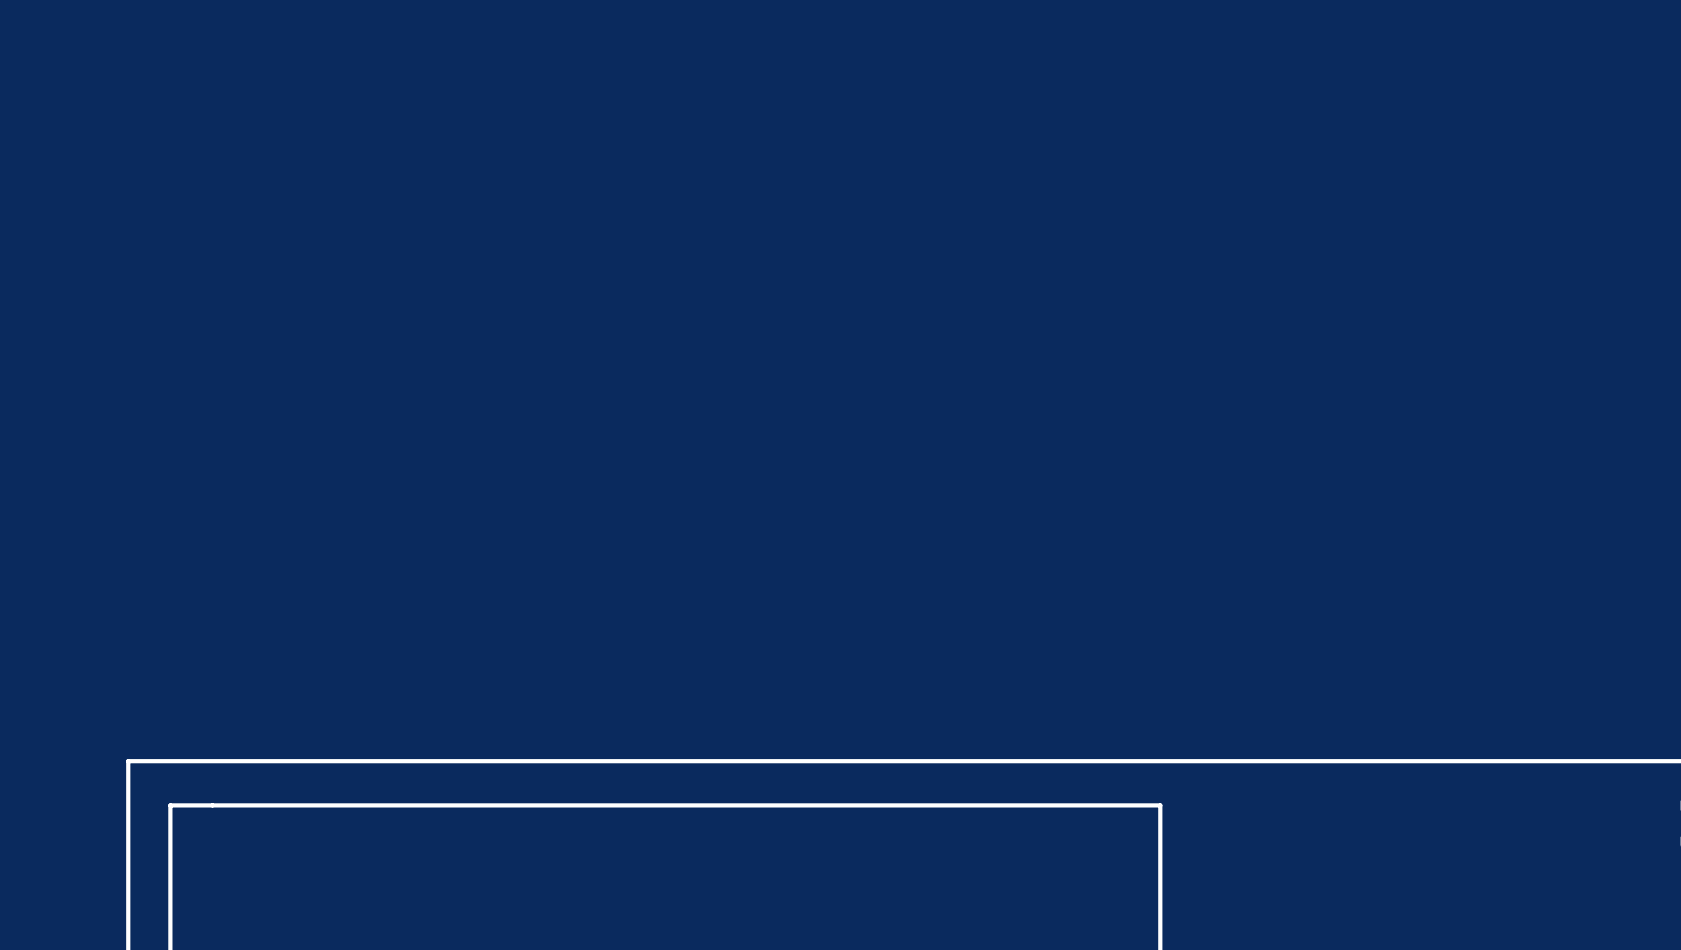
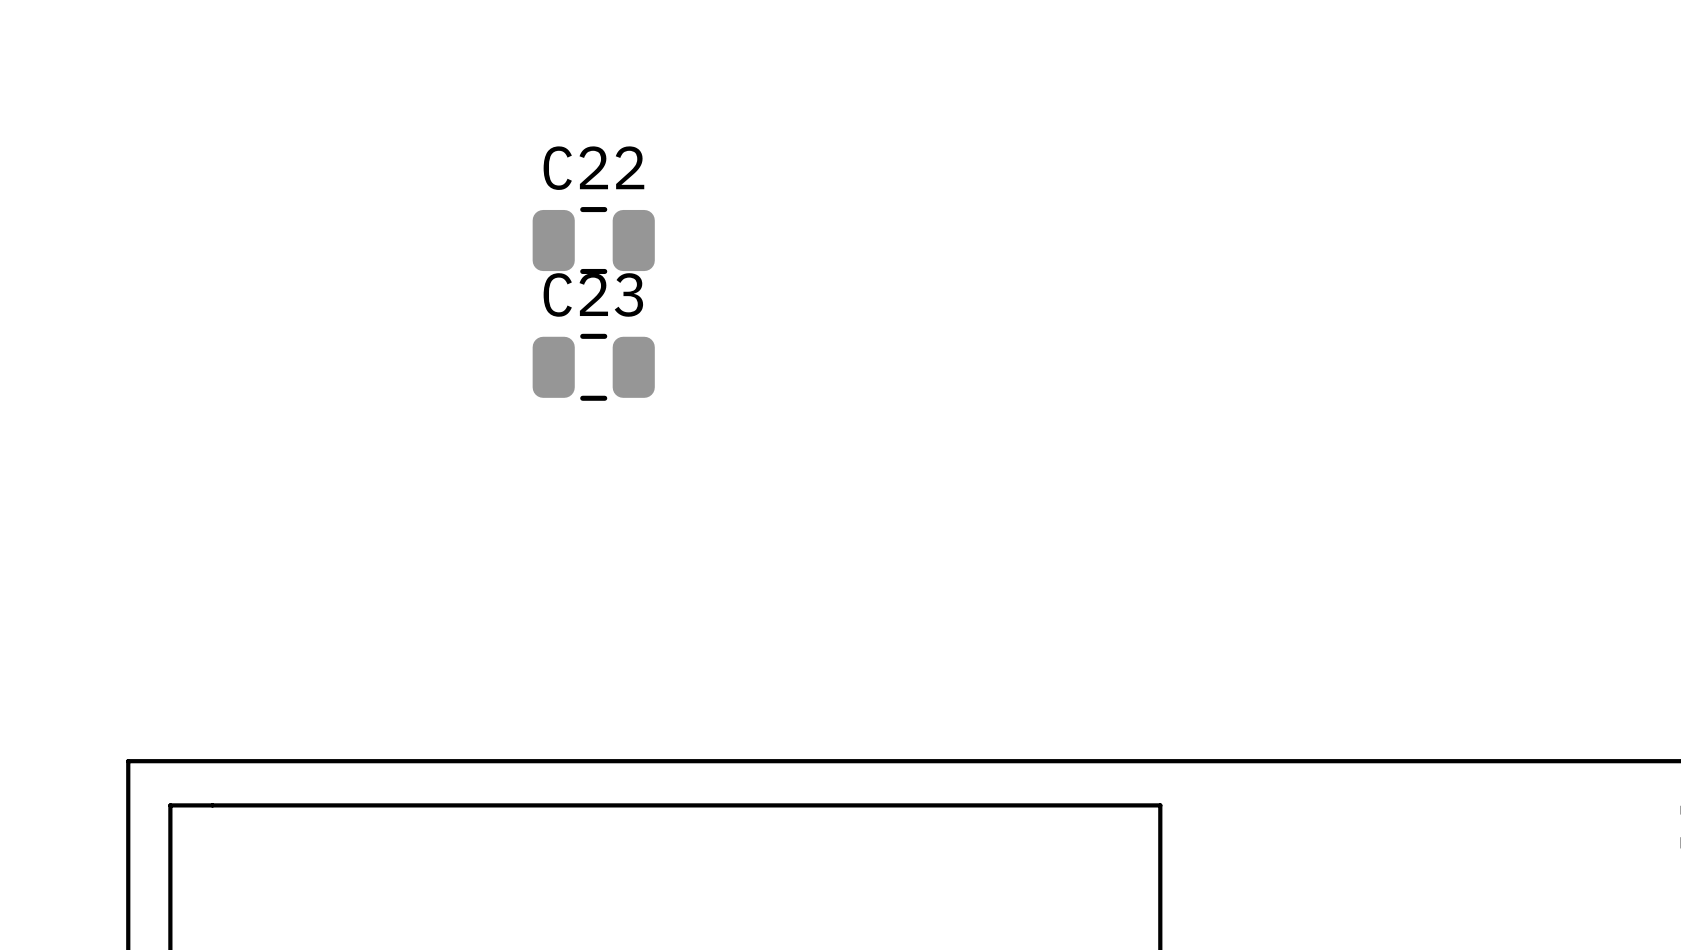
C22: none -> (593, 240)
C23: none -> (593, 367)

